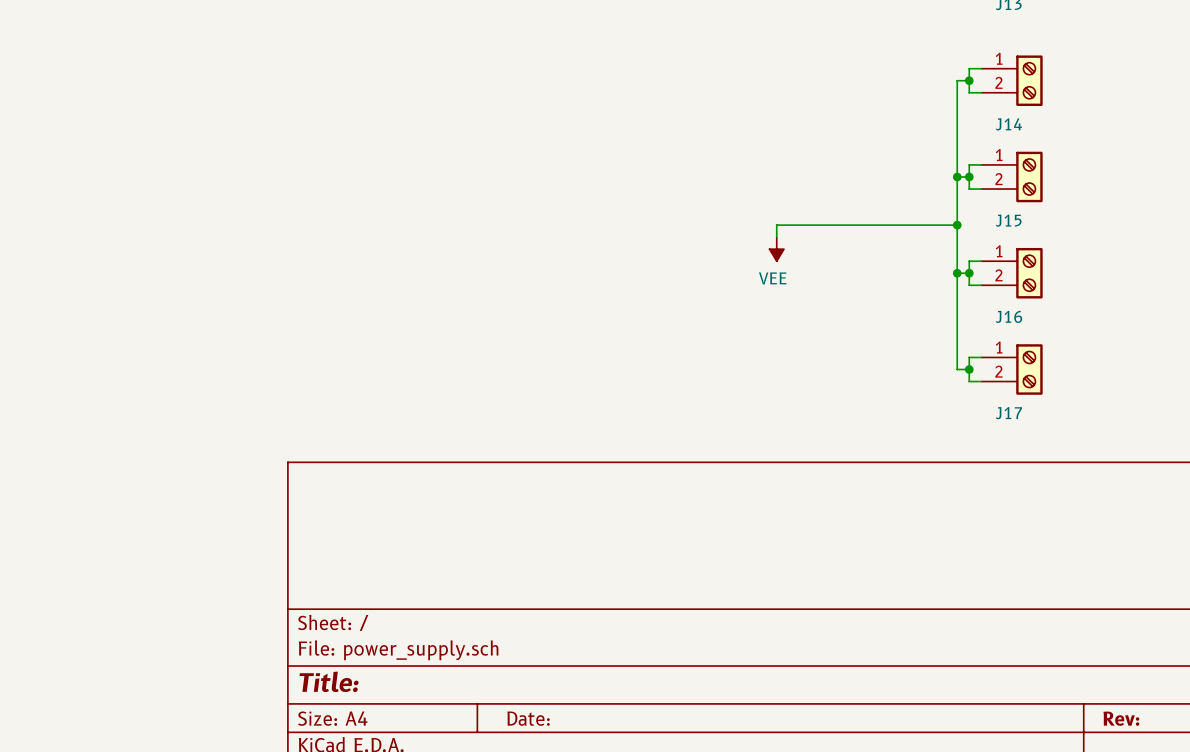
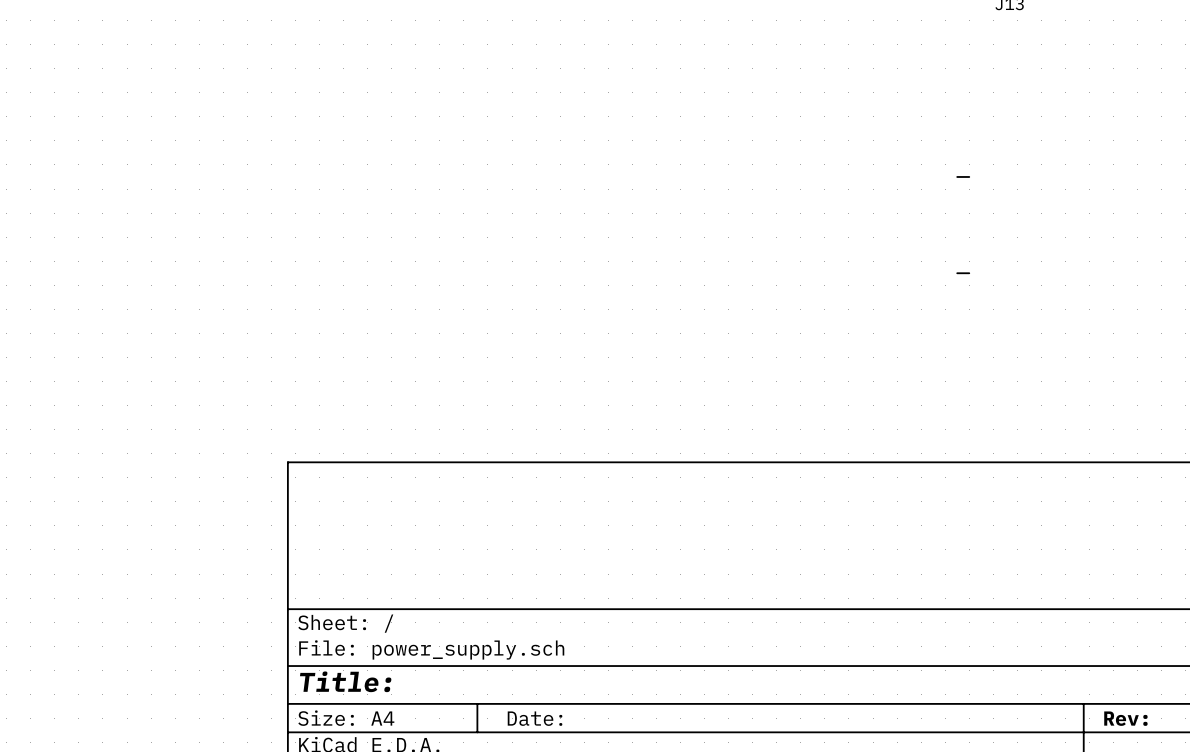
wire: (981, 68) (969, 68) (969, 92) (981, 92) -> none
wire: (969, 80) (957, 80) (957, 369) (969, 369) -> none
junction: (969, 80) -> none
J14: (1011, 80) -> none
wire: (981, 164) (969, 164) (969, 189) (981, 189) -> none
junction: (957, 176) -> none
junction: (969, 176) -> none
J15: (1011, 176) -> none
wire: (957, 225) (776, 225) (776, 237) -> none
junction: (957, 225) -> none
power symbol: VEE (776, 249) -> none
wire: (981, 261) (969, 261) (969, 285) (981, 285) -> none
junction: (957, 273) -> none
junction: (969, 273) -> none
J16: (1011, 273) -> none
wire: (981, 357) (969, 357) (969, 381) (981, 381) -> none
junction: (969, 369) -> none
J17: (1011, 369) -> none

